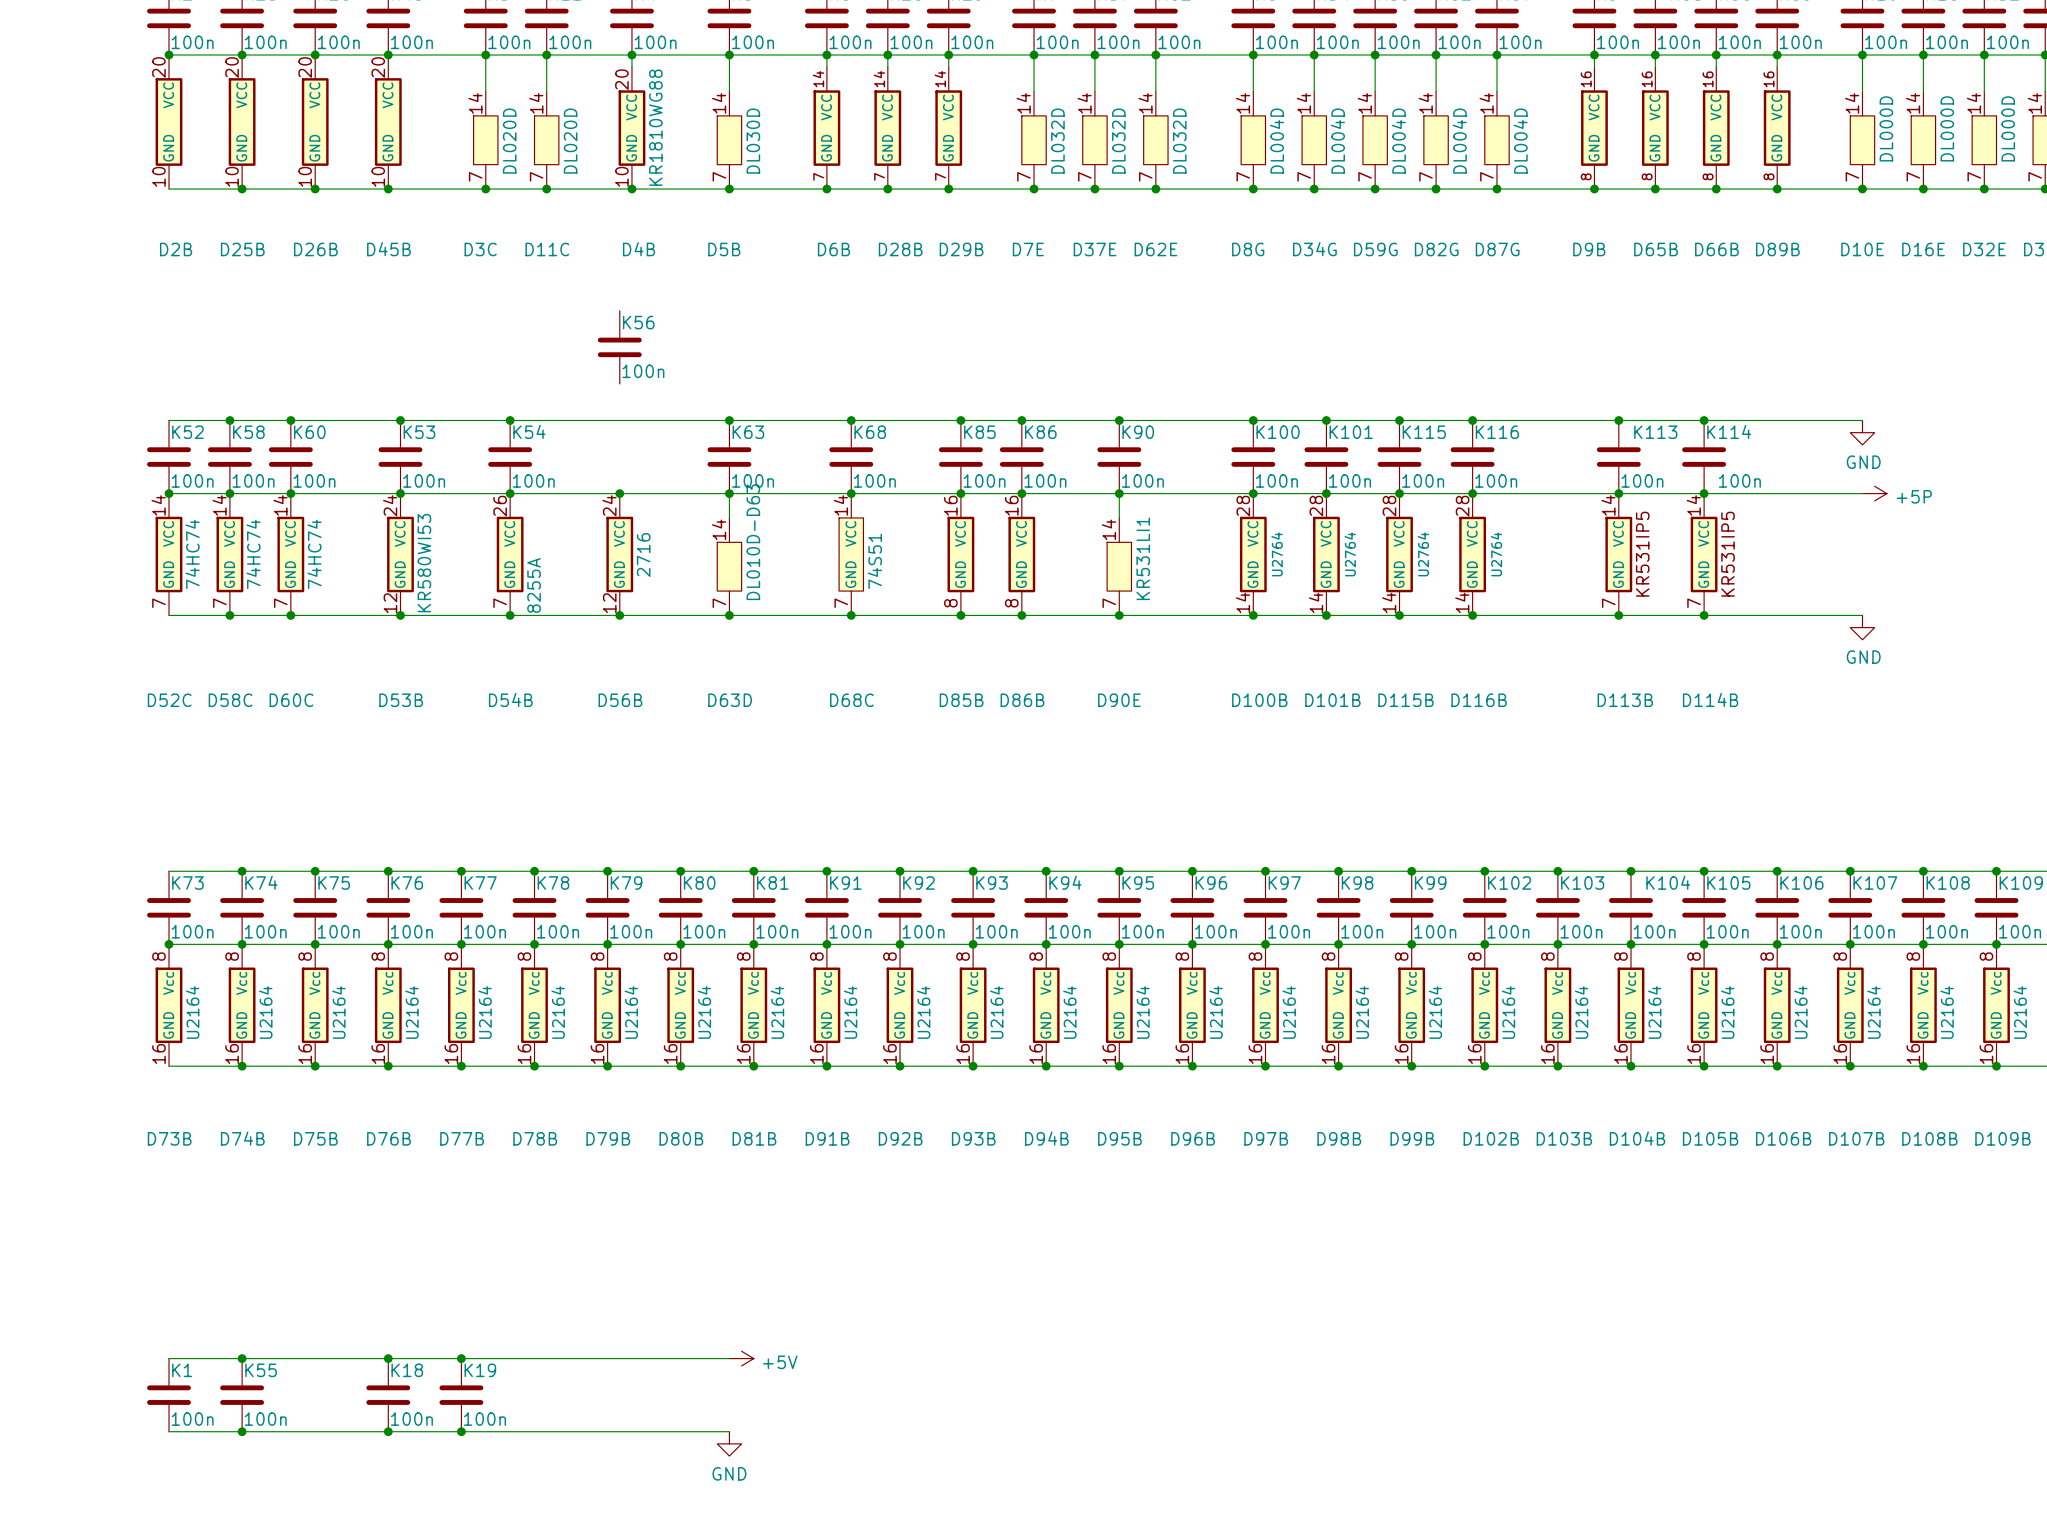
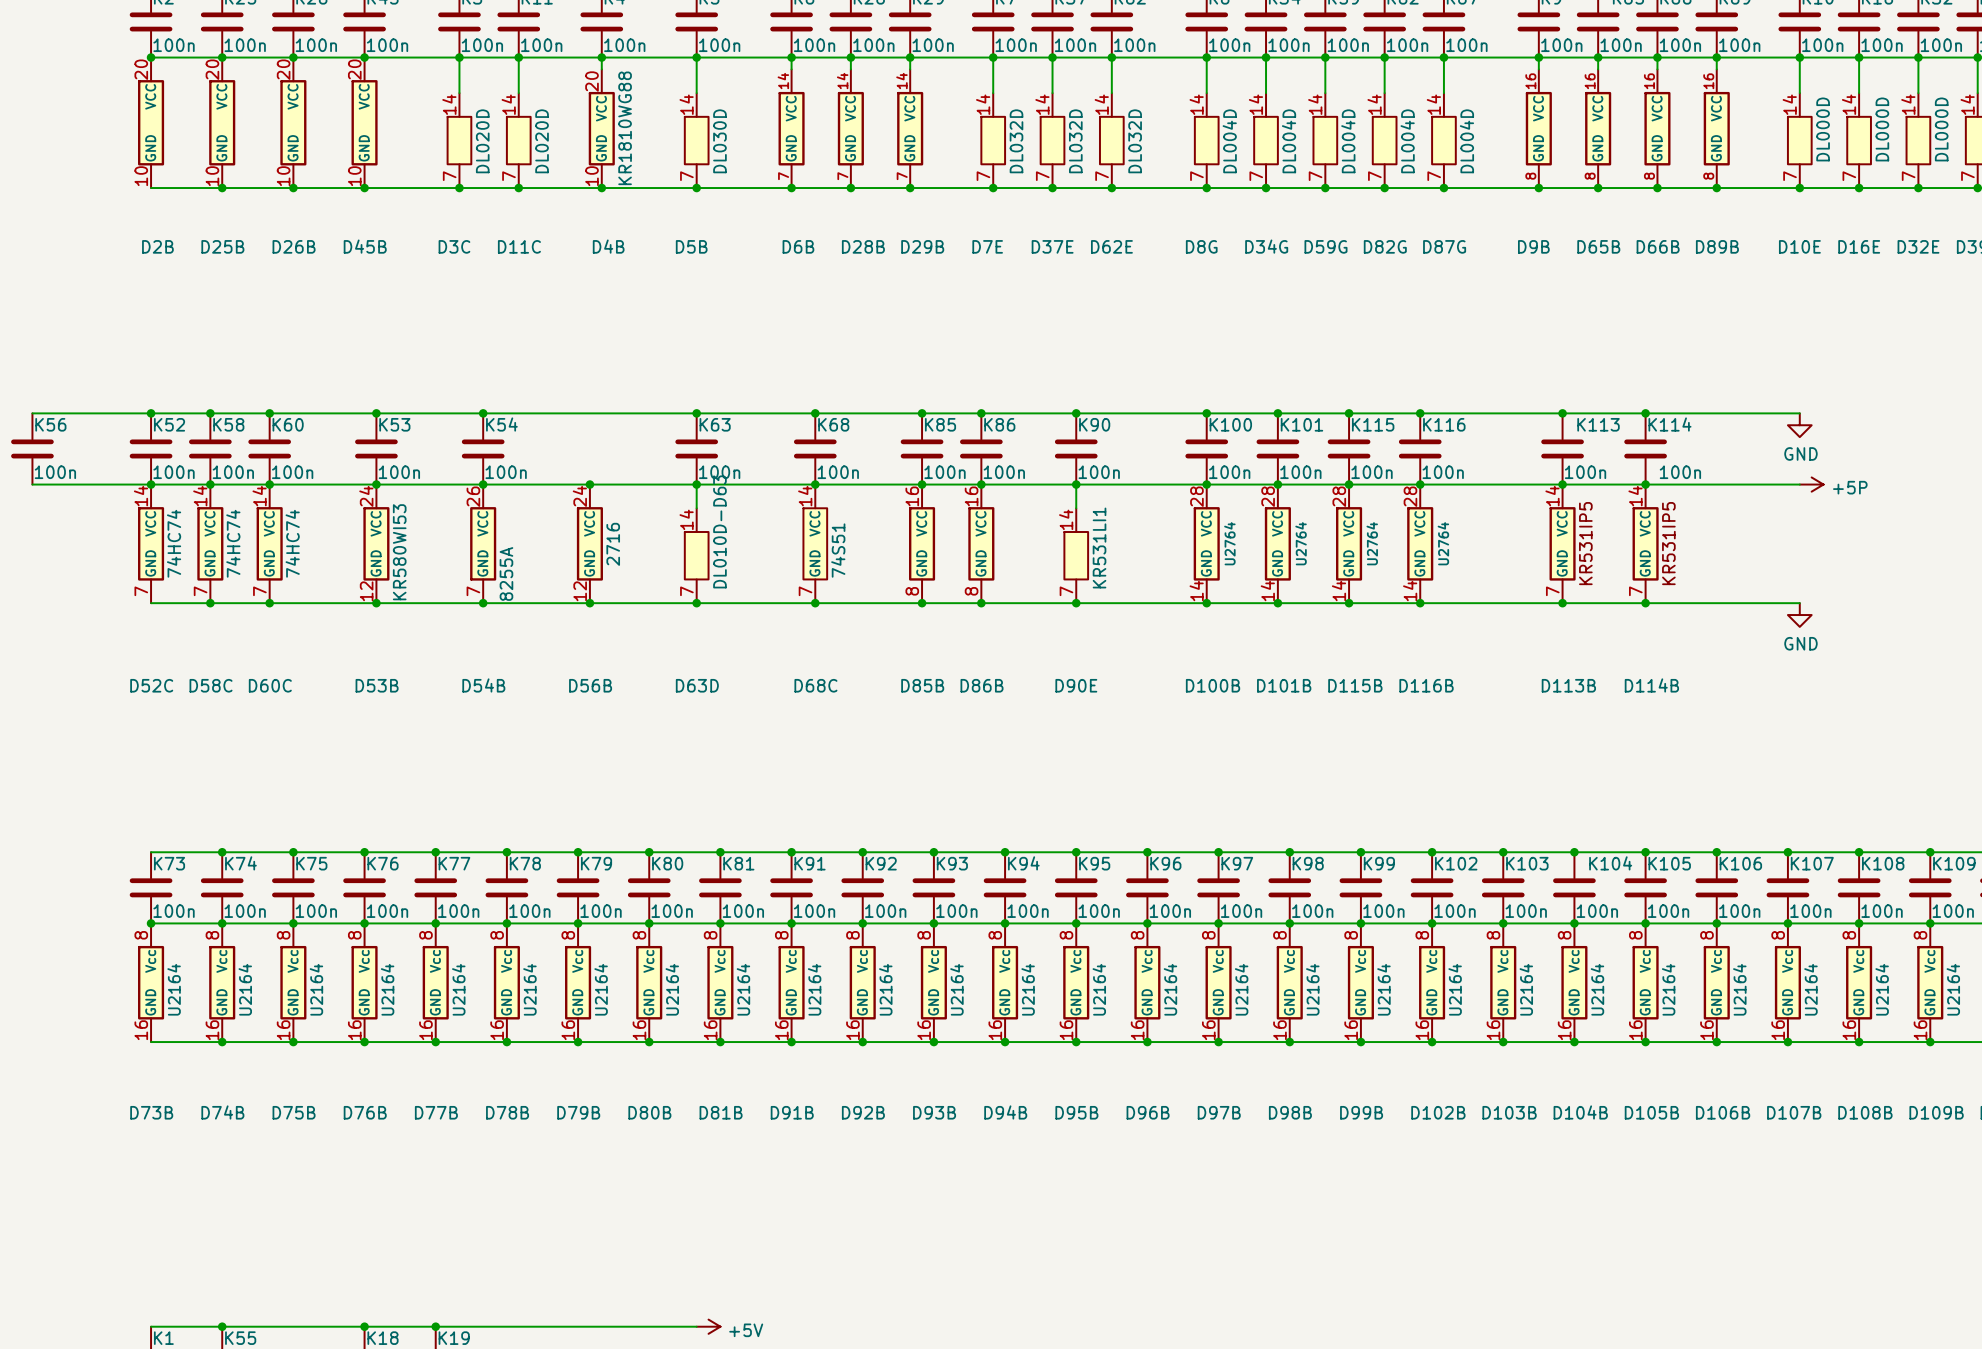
K56 position: (619, 347) -> (32, 448)
wire: none -> (32, 413) (151, 413)
junction: none -> (151, 413)
wire: none -> (32, 484) (151, 484)

